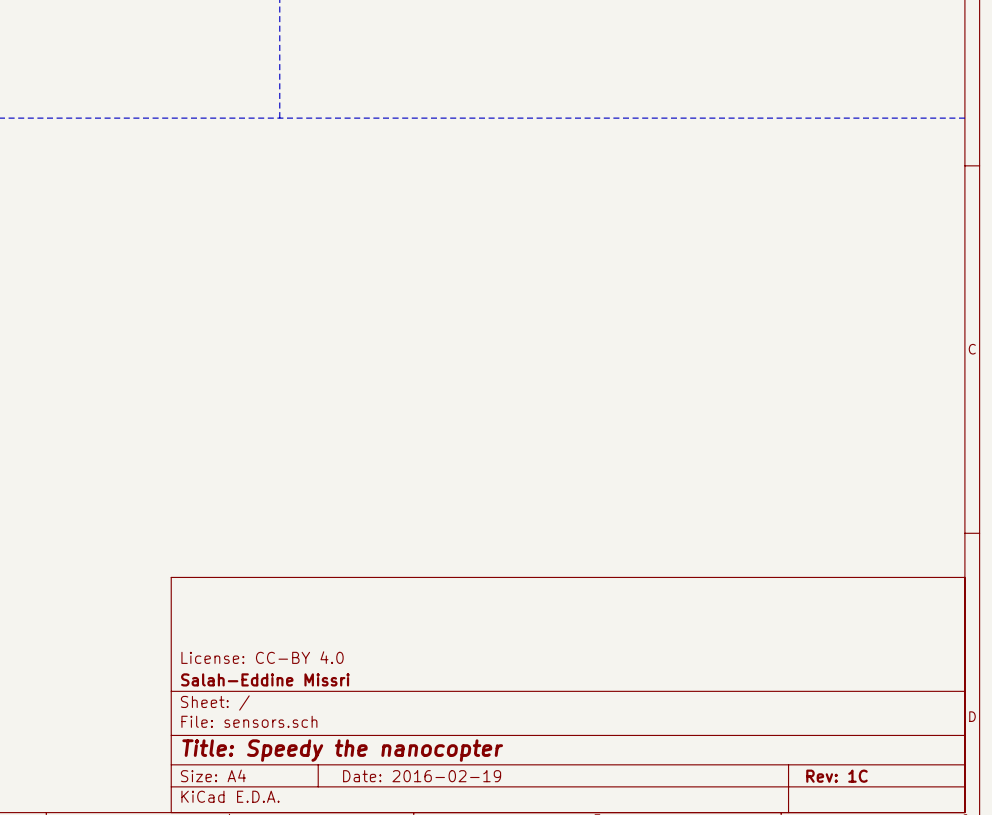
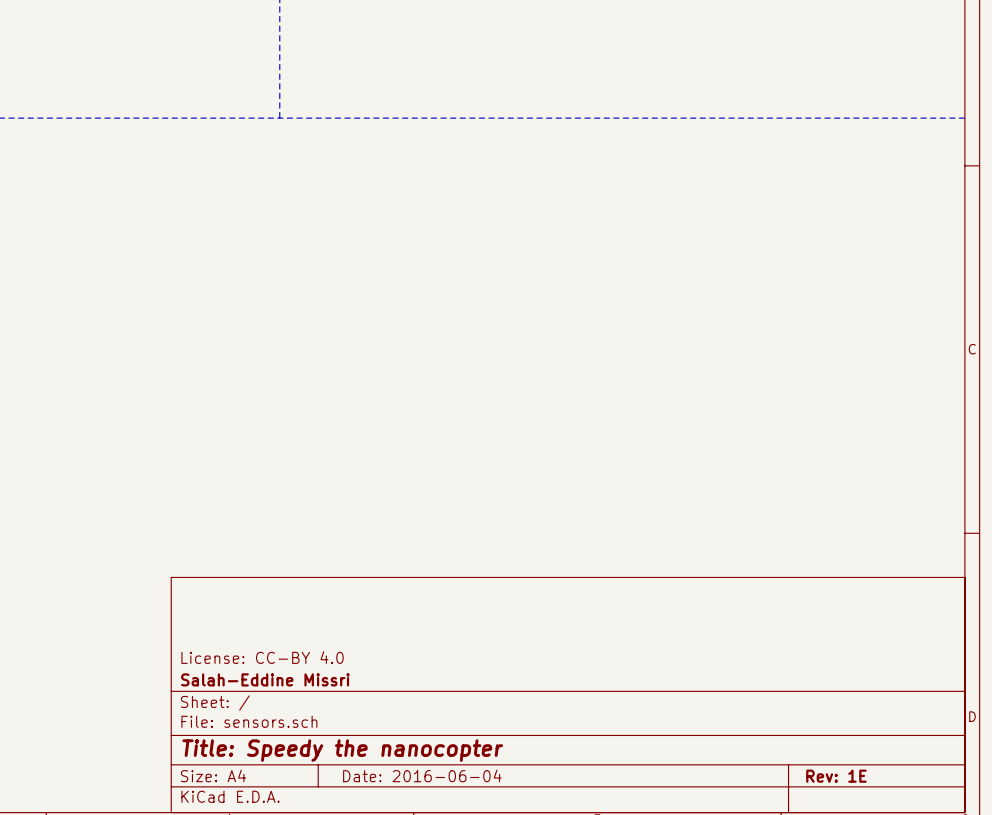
title block: Date: 2016-02-19 (422, 776) -> Date: 2016-06-04 (422, 775)
title block: Rev: 1C (836, 776) -> Rev: 1E (836, 776)

